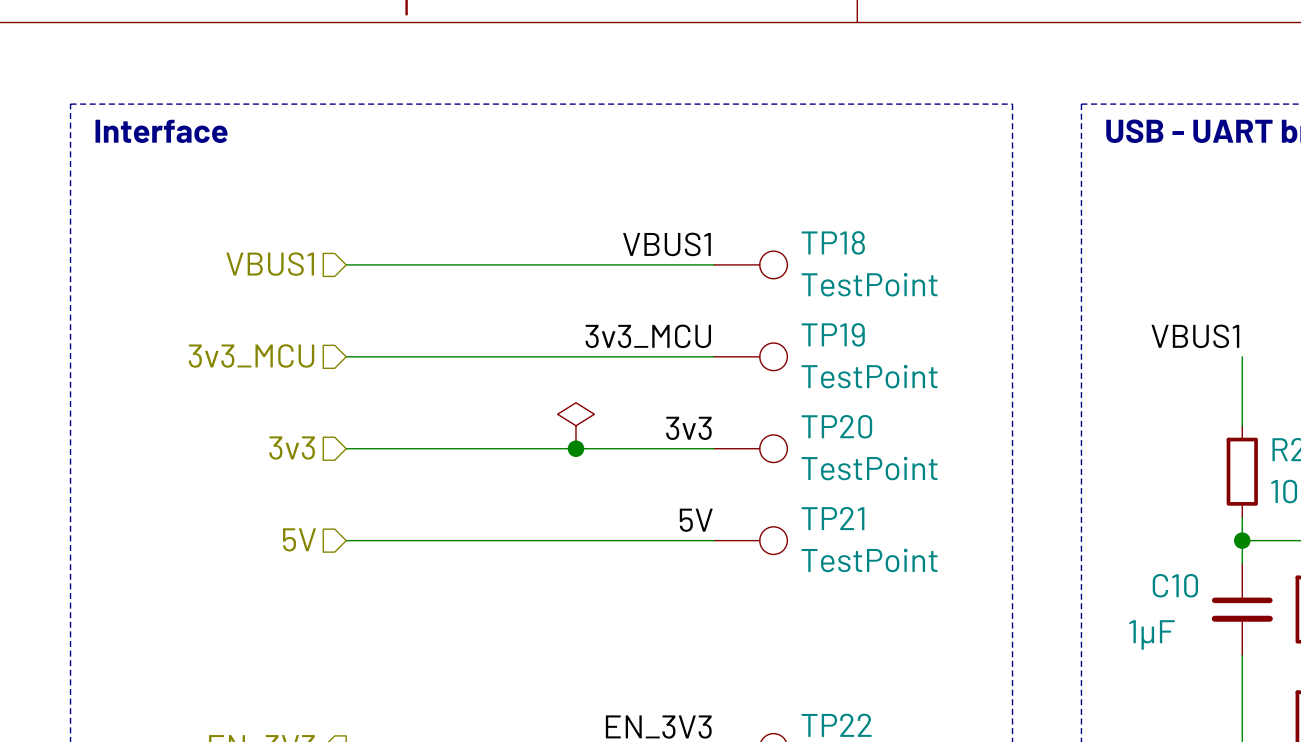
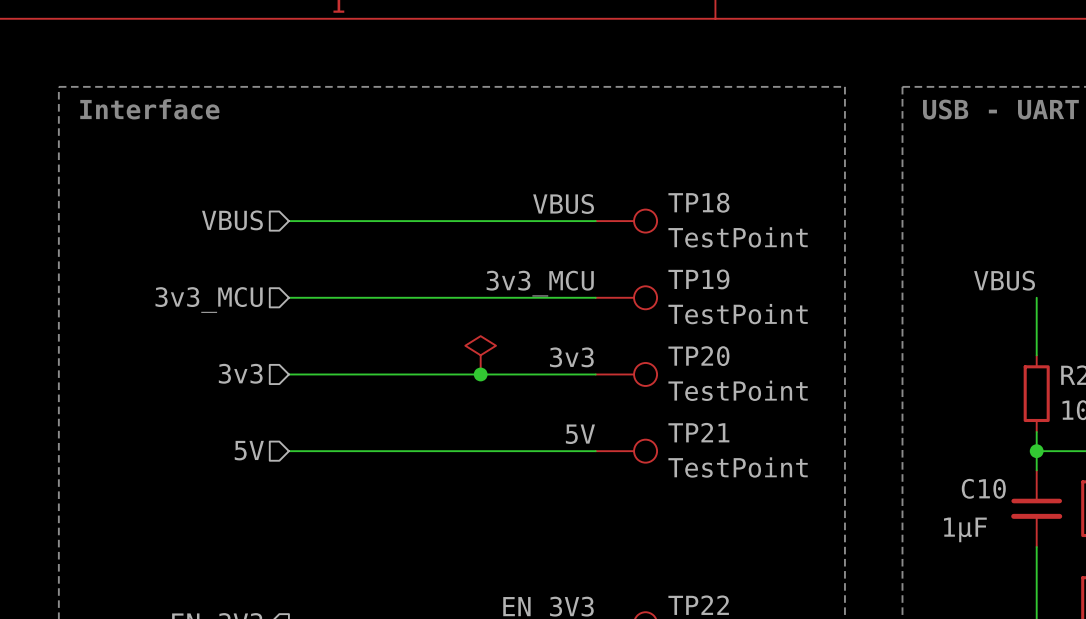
label: VBUS1 (666, 244) -> VBUS (563, 203)
hierarchical label: VBUS1 (270, 264) -> VBUS (232, 220)
label: VBUS1 (1195, 336) -> VBUS (1004, 280)

